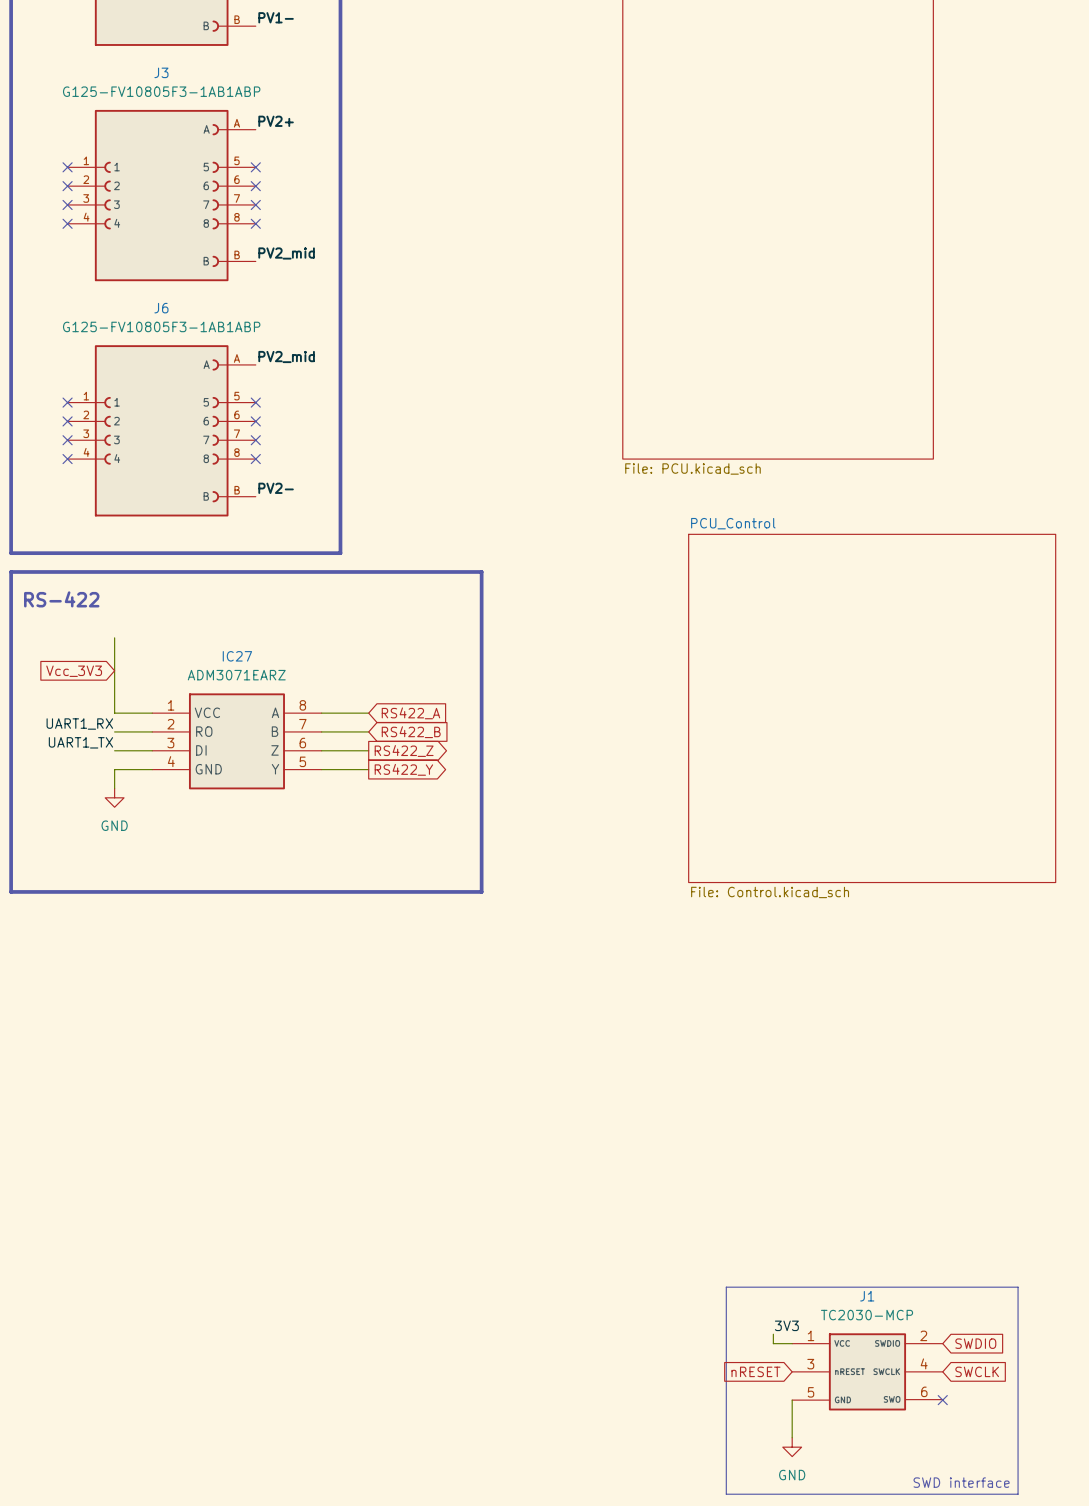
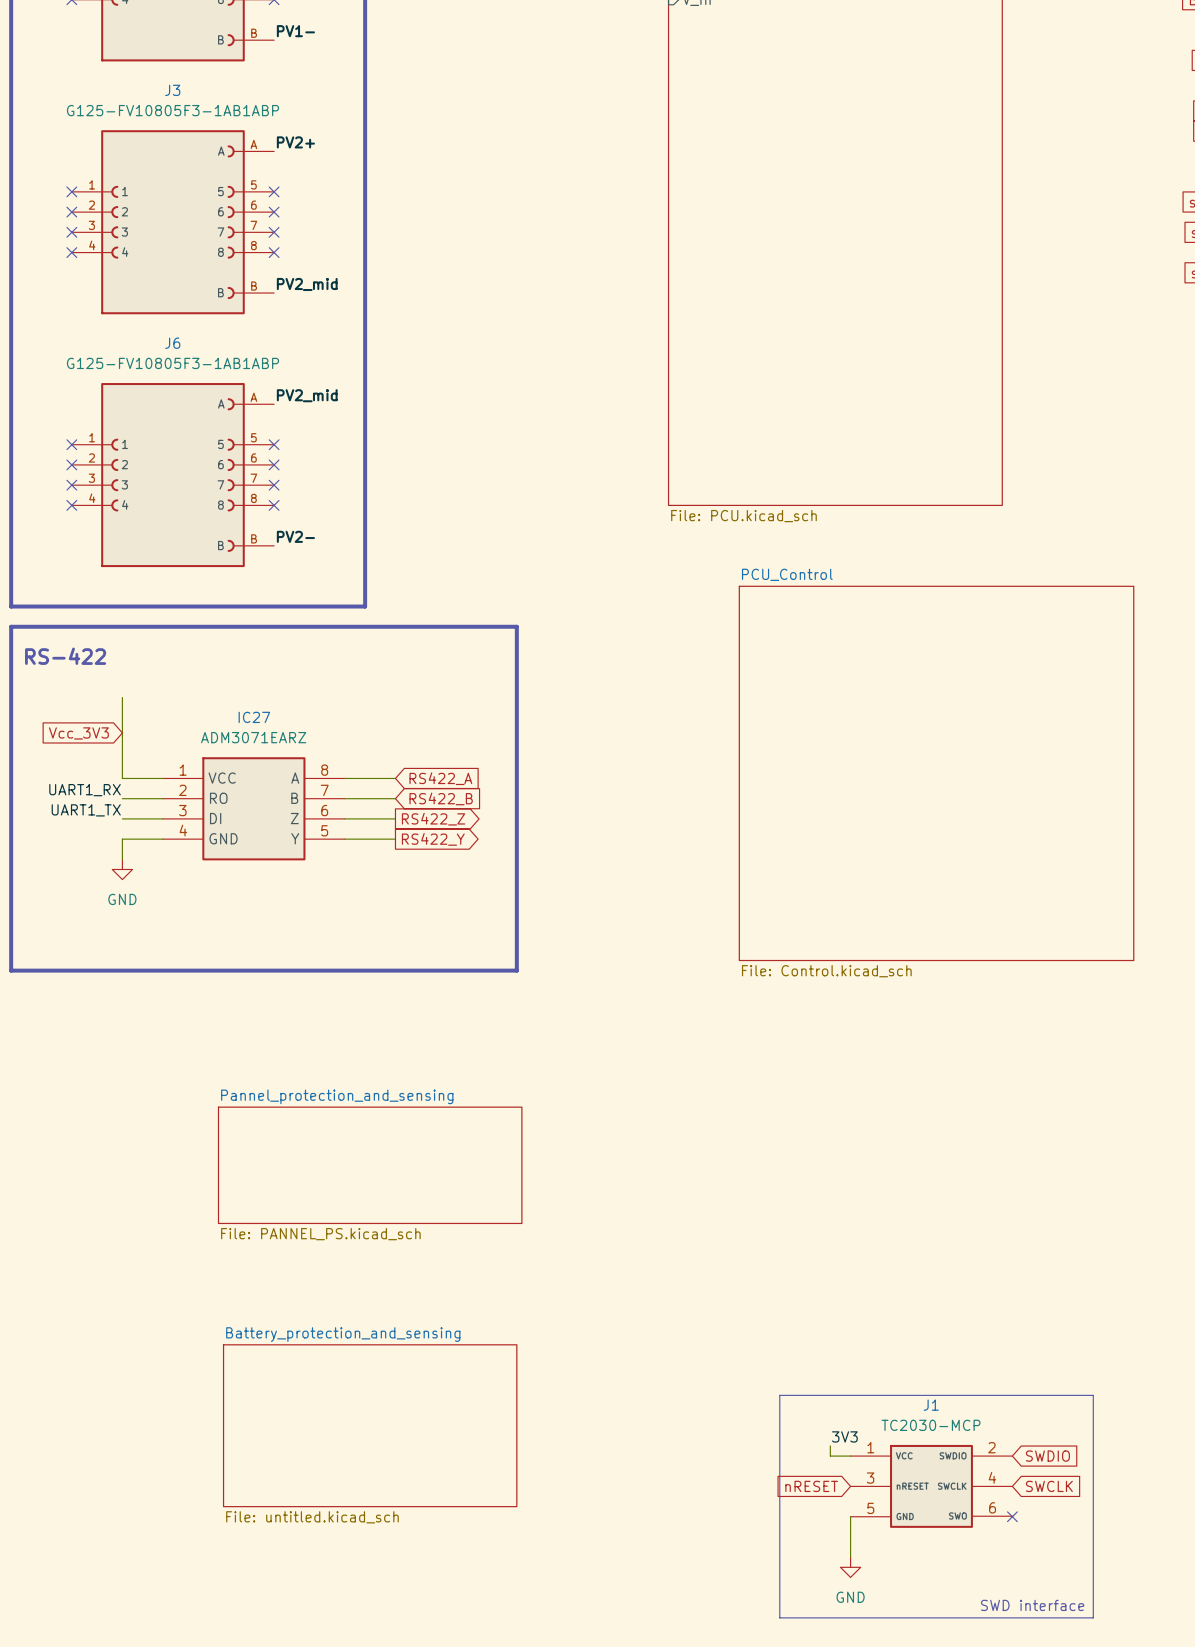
sheet Pannel_protection_and_sensing: none -> File: PANNEL_PS.kicad_sch (370, 1165)
sheet Battery_protection_and_sensing: none -> File: untitled.kicad_sch (370, 1425)

